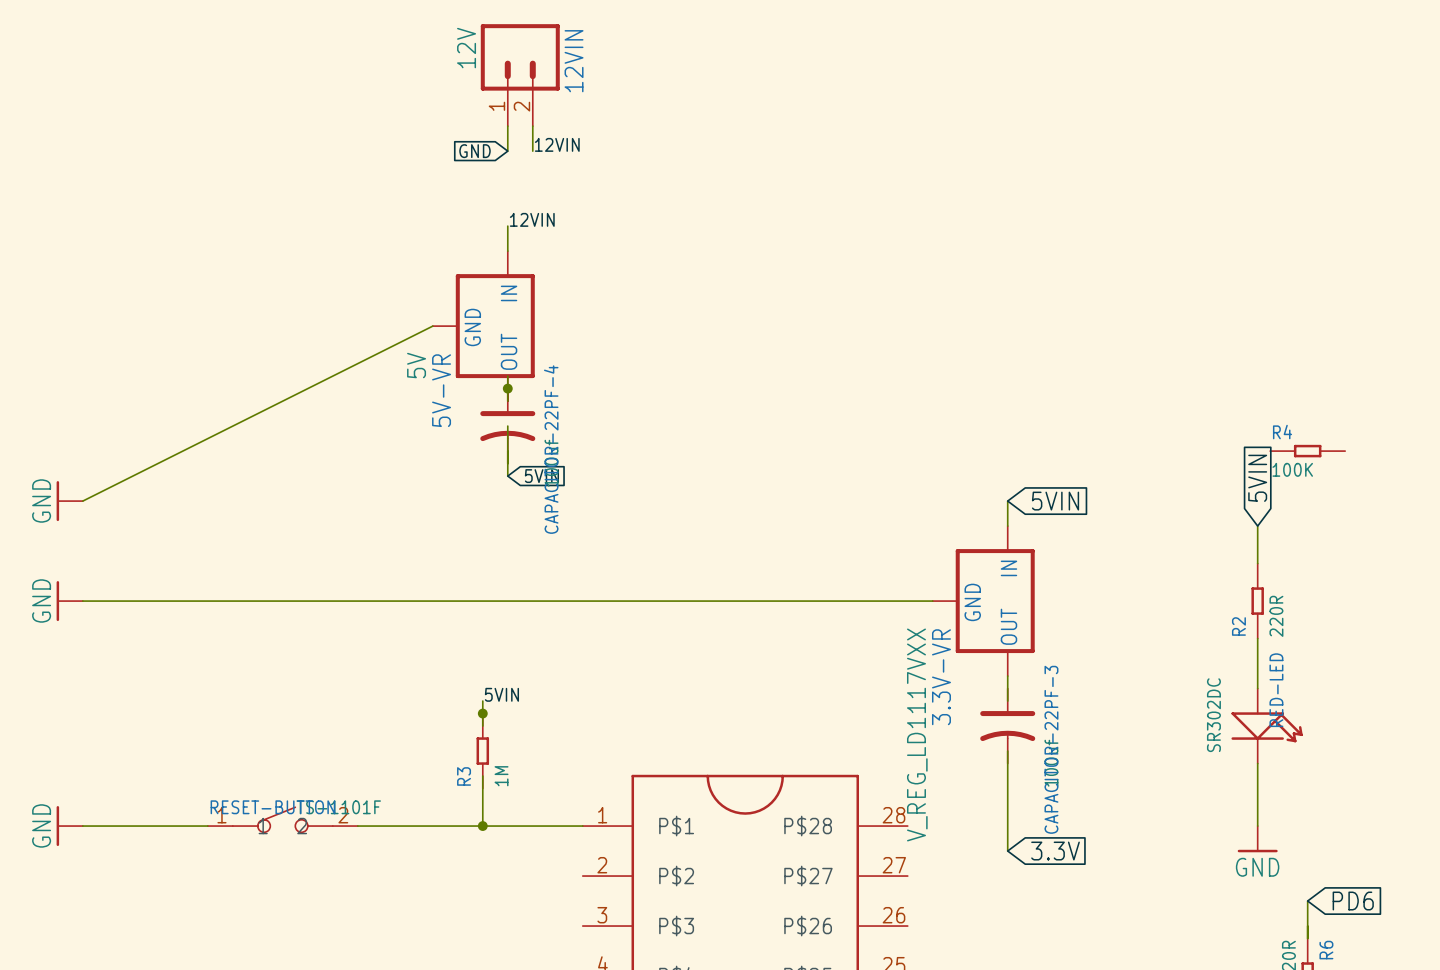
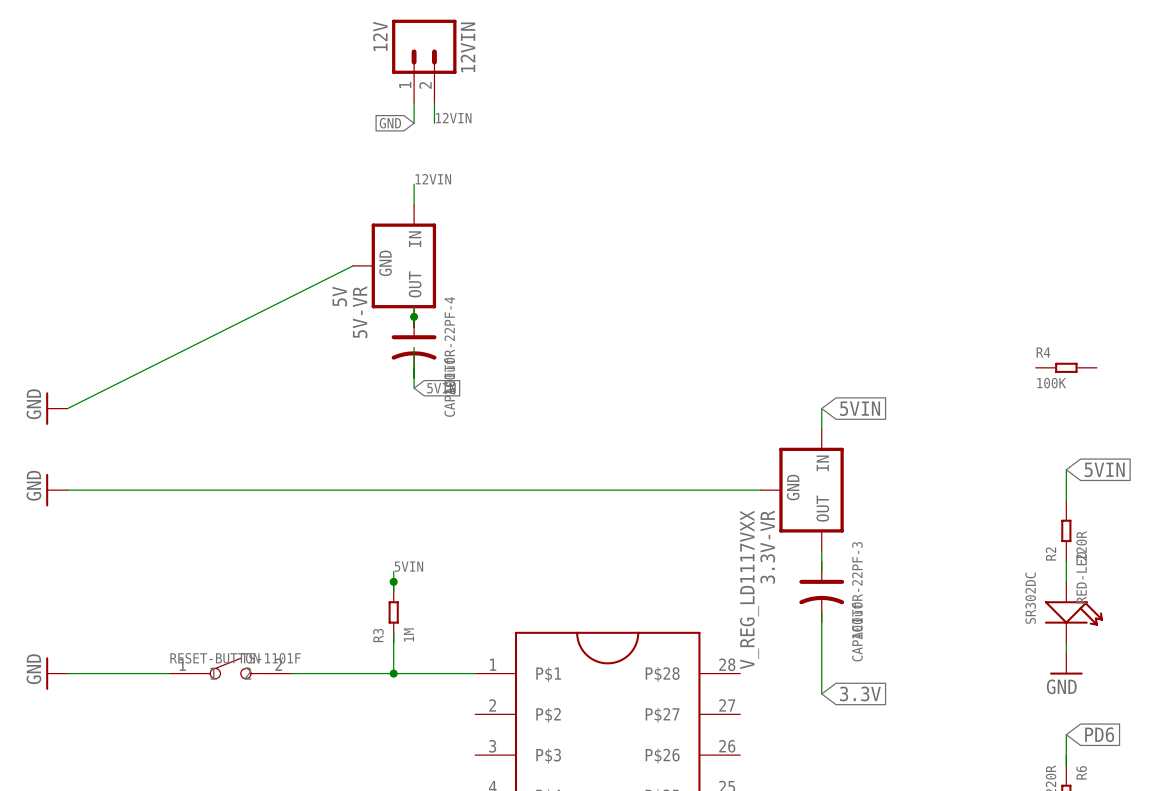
global label rotation: 0° (1257, 478) -> 90° clockwise (1104, 469)
global label position: 5VIN (1257, 478) -> 5VIN (1104, 469)
wire: (1257, 526) (1257, 563) -> (1066, 469) (1066, 500)
R2 position: (1257, 601) -> (1066, 530)
wire: (1257, 638) (1257, 688) -> none
wire: none -> (1066, 561) (1066, 581)
RED-LED position: (1267, 726) -> (1073, 612)
wire: (1257, 763) (1257, 826) -> none
wire: none -> (1066, 643) (1066, 653)
power symbol position: GND (1257, 839) -> GND (1066, 663)

